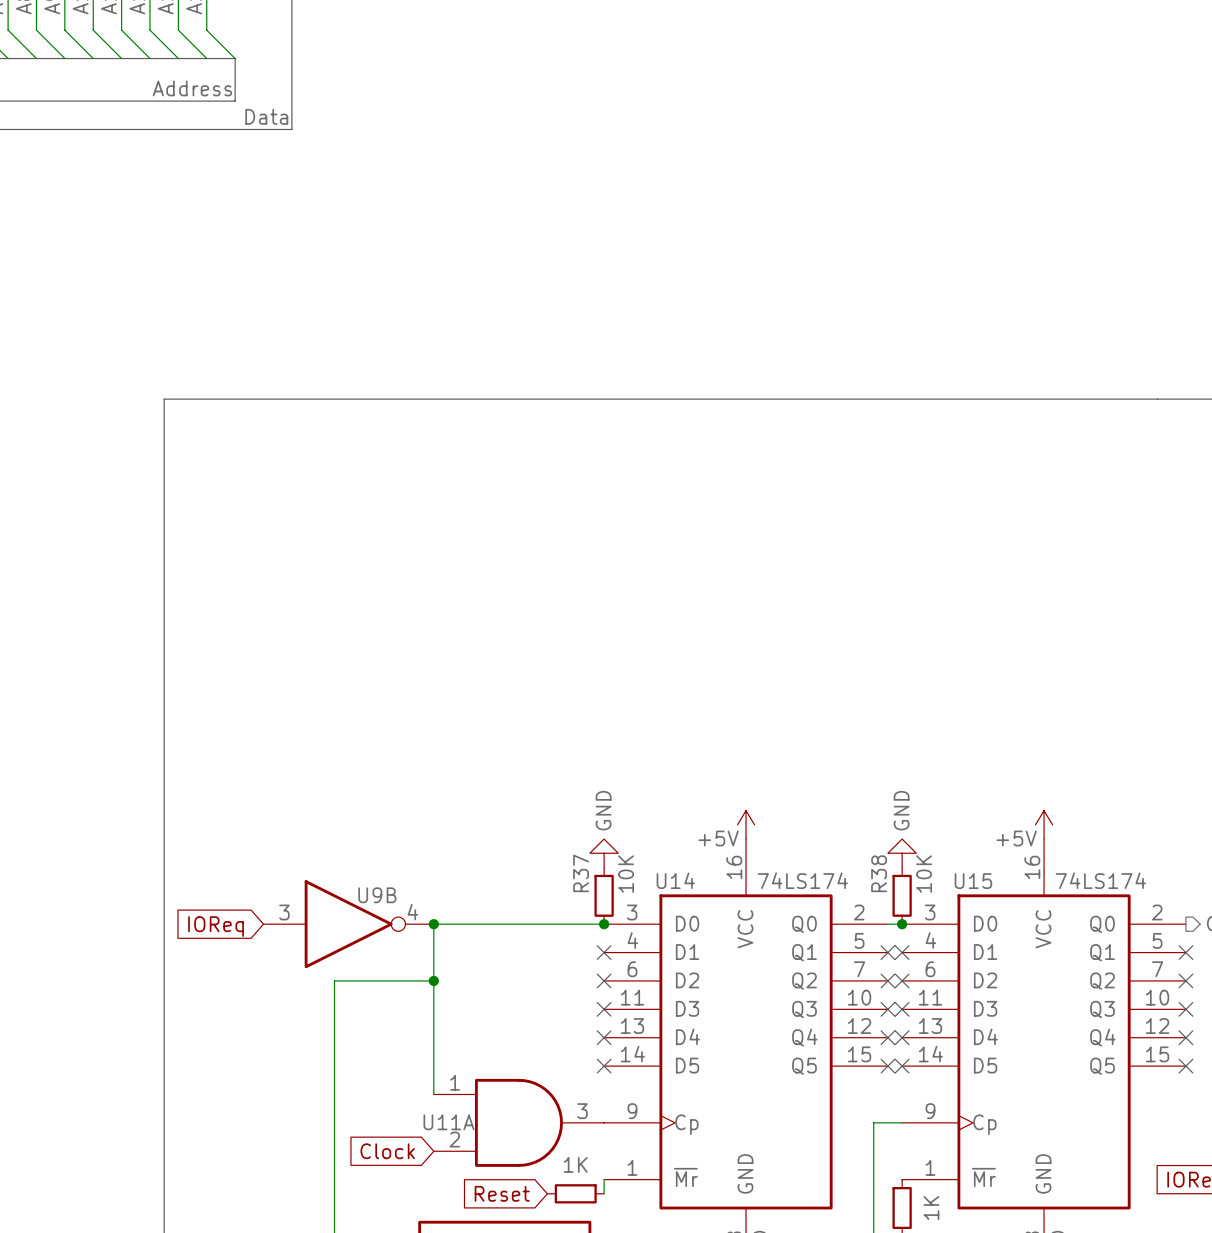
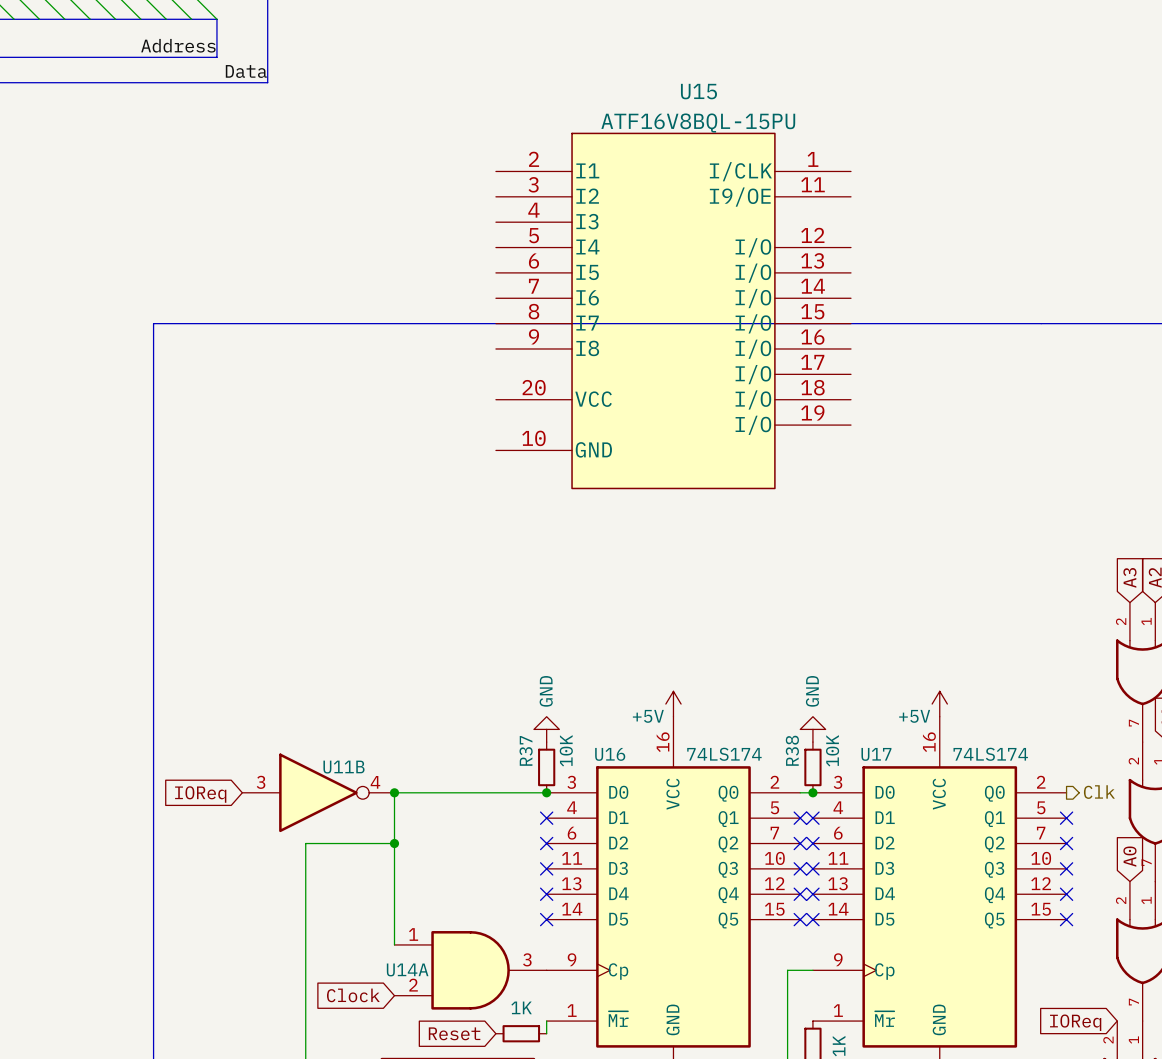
U15: none -> ATF16V8BQL-15PU (673, 310)
U14 name: U14 (675, 880) -> U16 (610, 754)
U15 name: U15 (973, 881) -> U17 (876, 754)
U9B name: U9B (377, 895) -> U11B (343, 767)
U11A name: U11A (449, 1122) -> U14A (407, 969)

